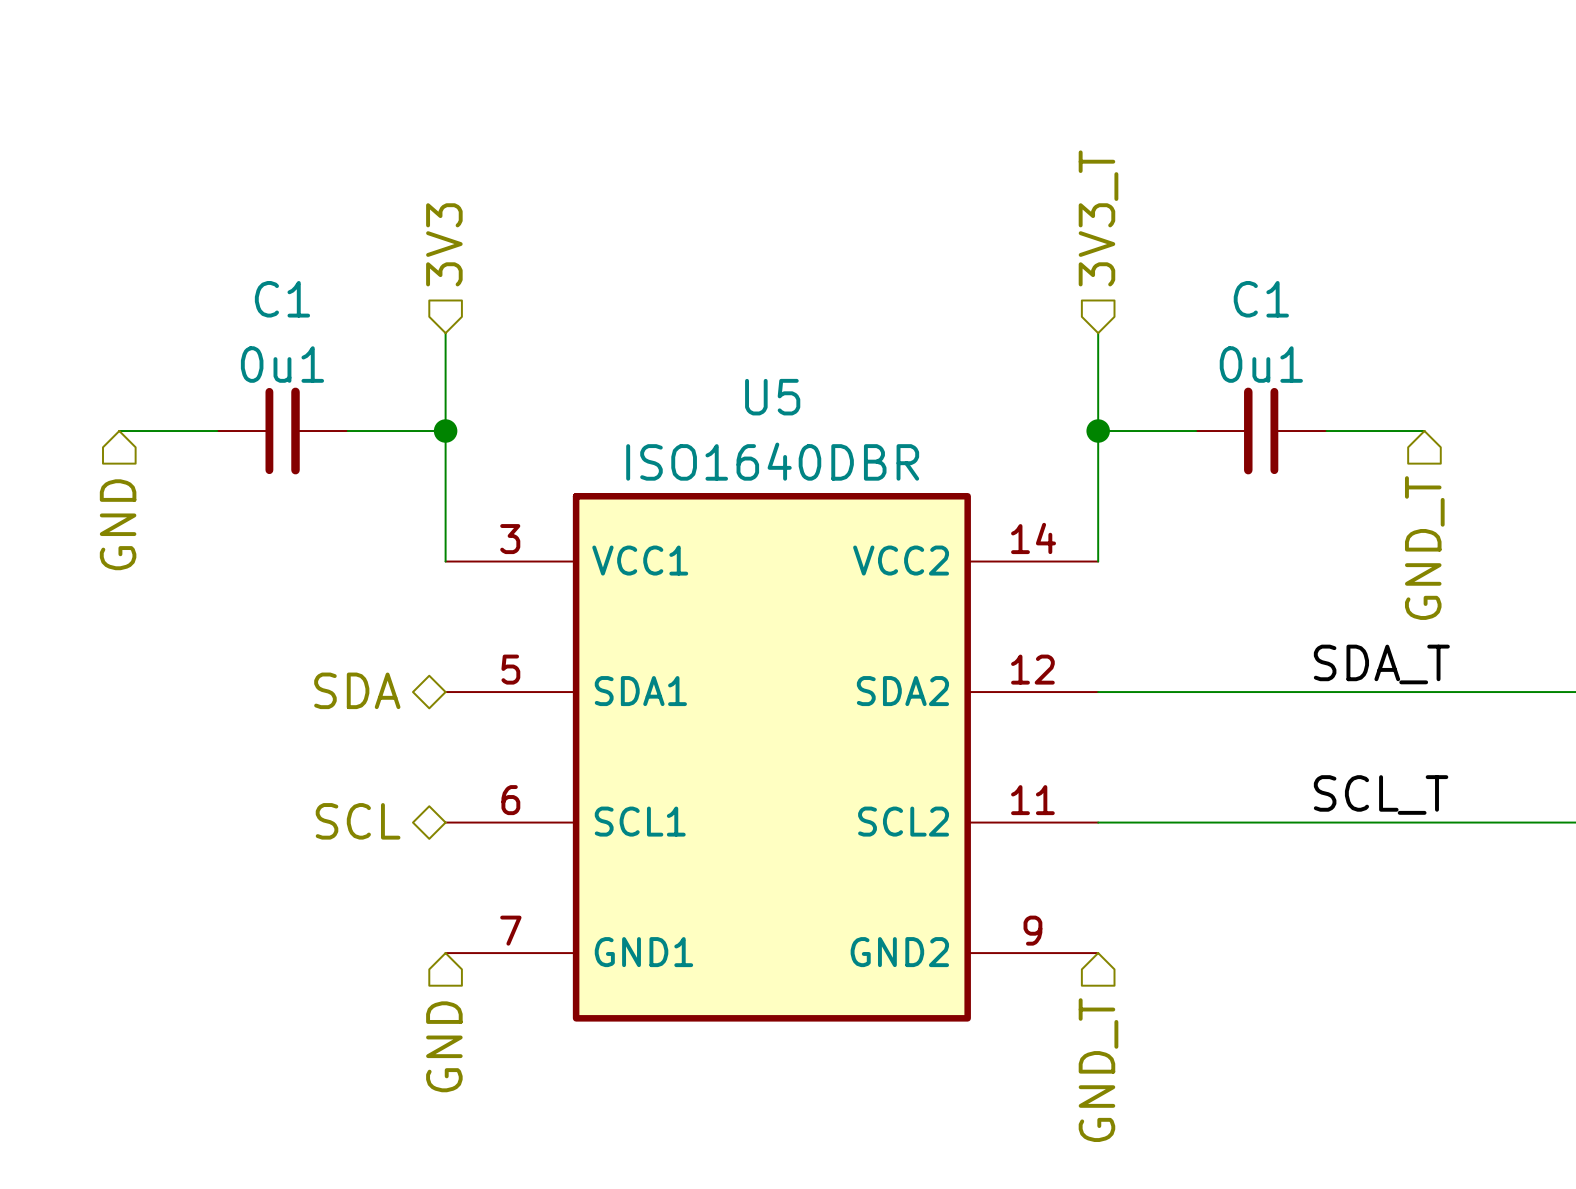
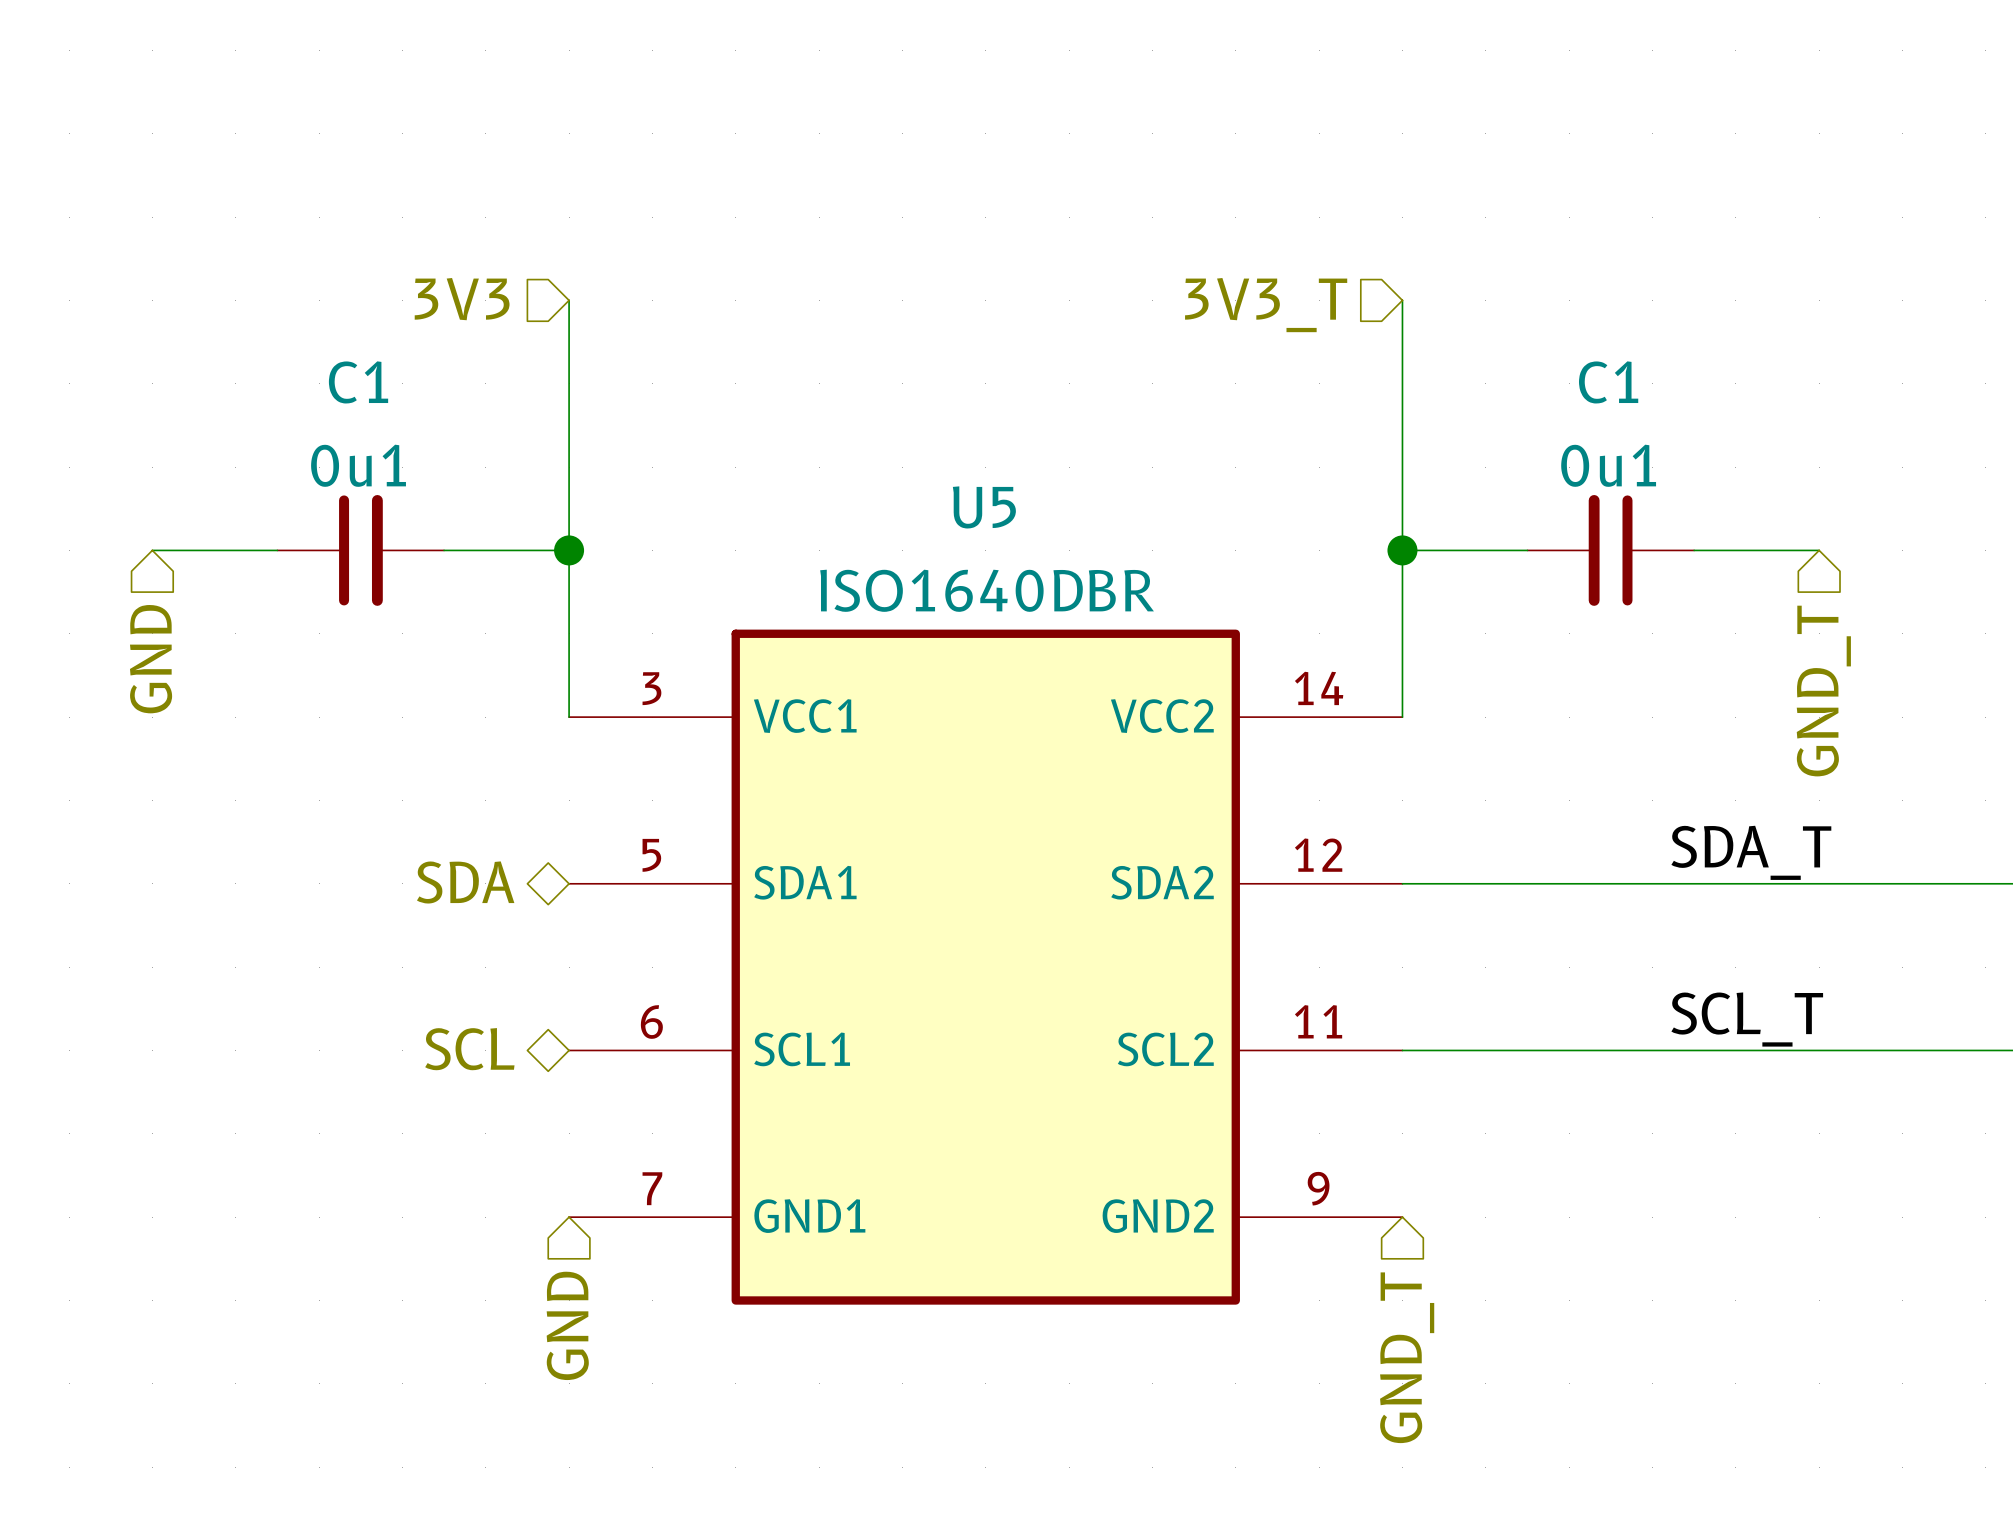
hierarchical label rotation: 0° (1098, 218) -> 90° counterclockwise (1266, 305)
wire: none -> (569, 300) (569, 425)
wire: none -> (1402, 300) (1402, 425)
hierarchical label rotation: 0° (444, 244) -> 90° counterclockwise (462, 299)

